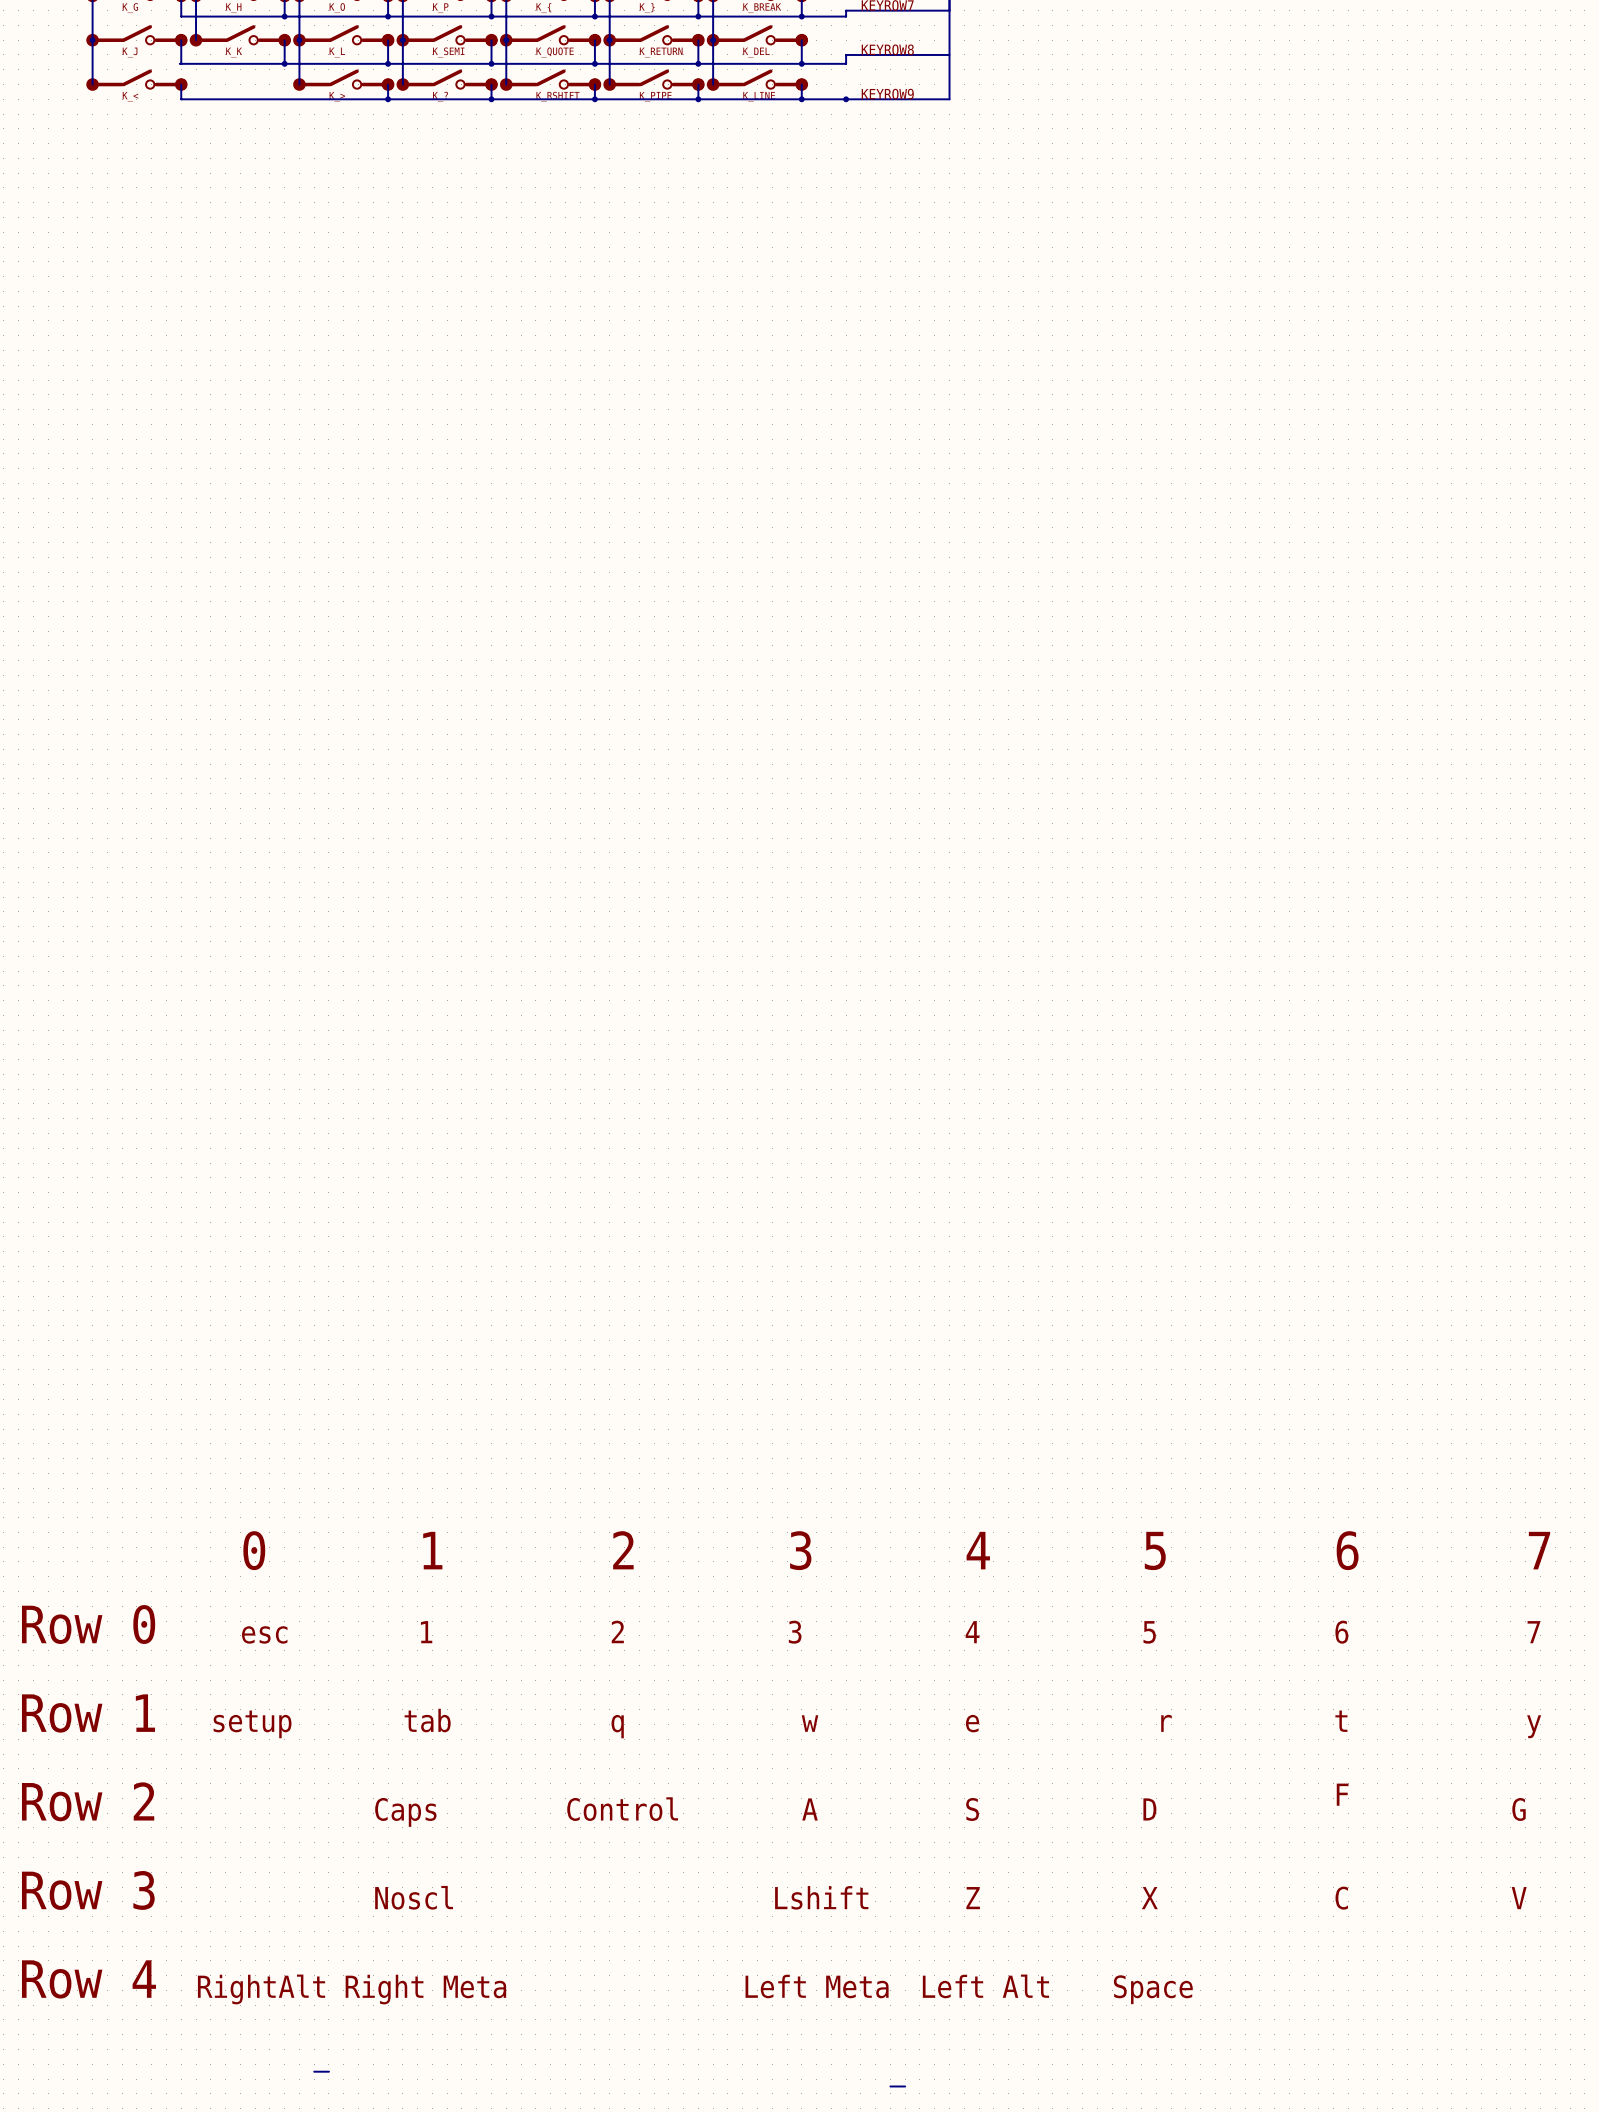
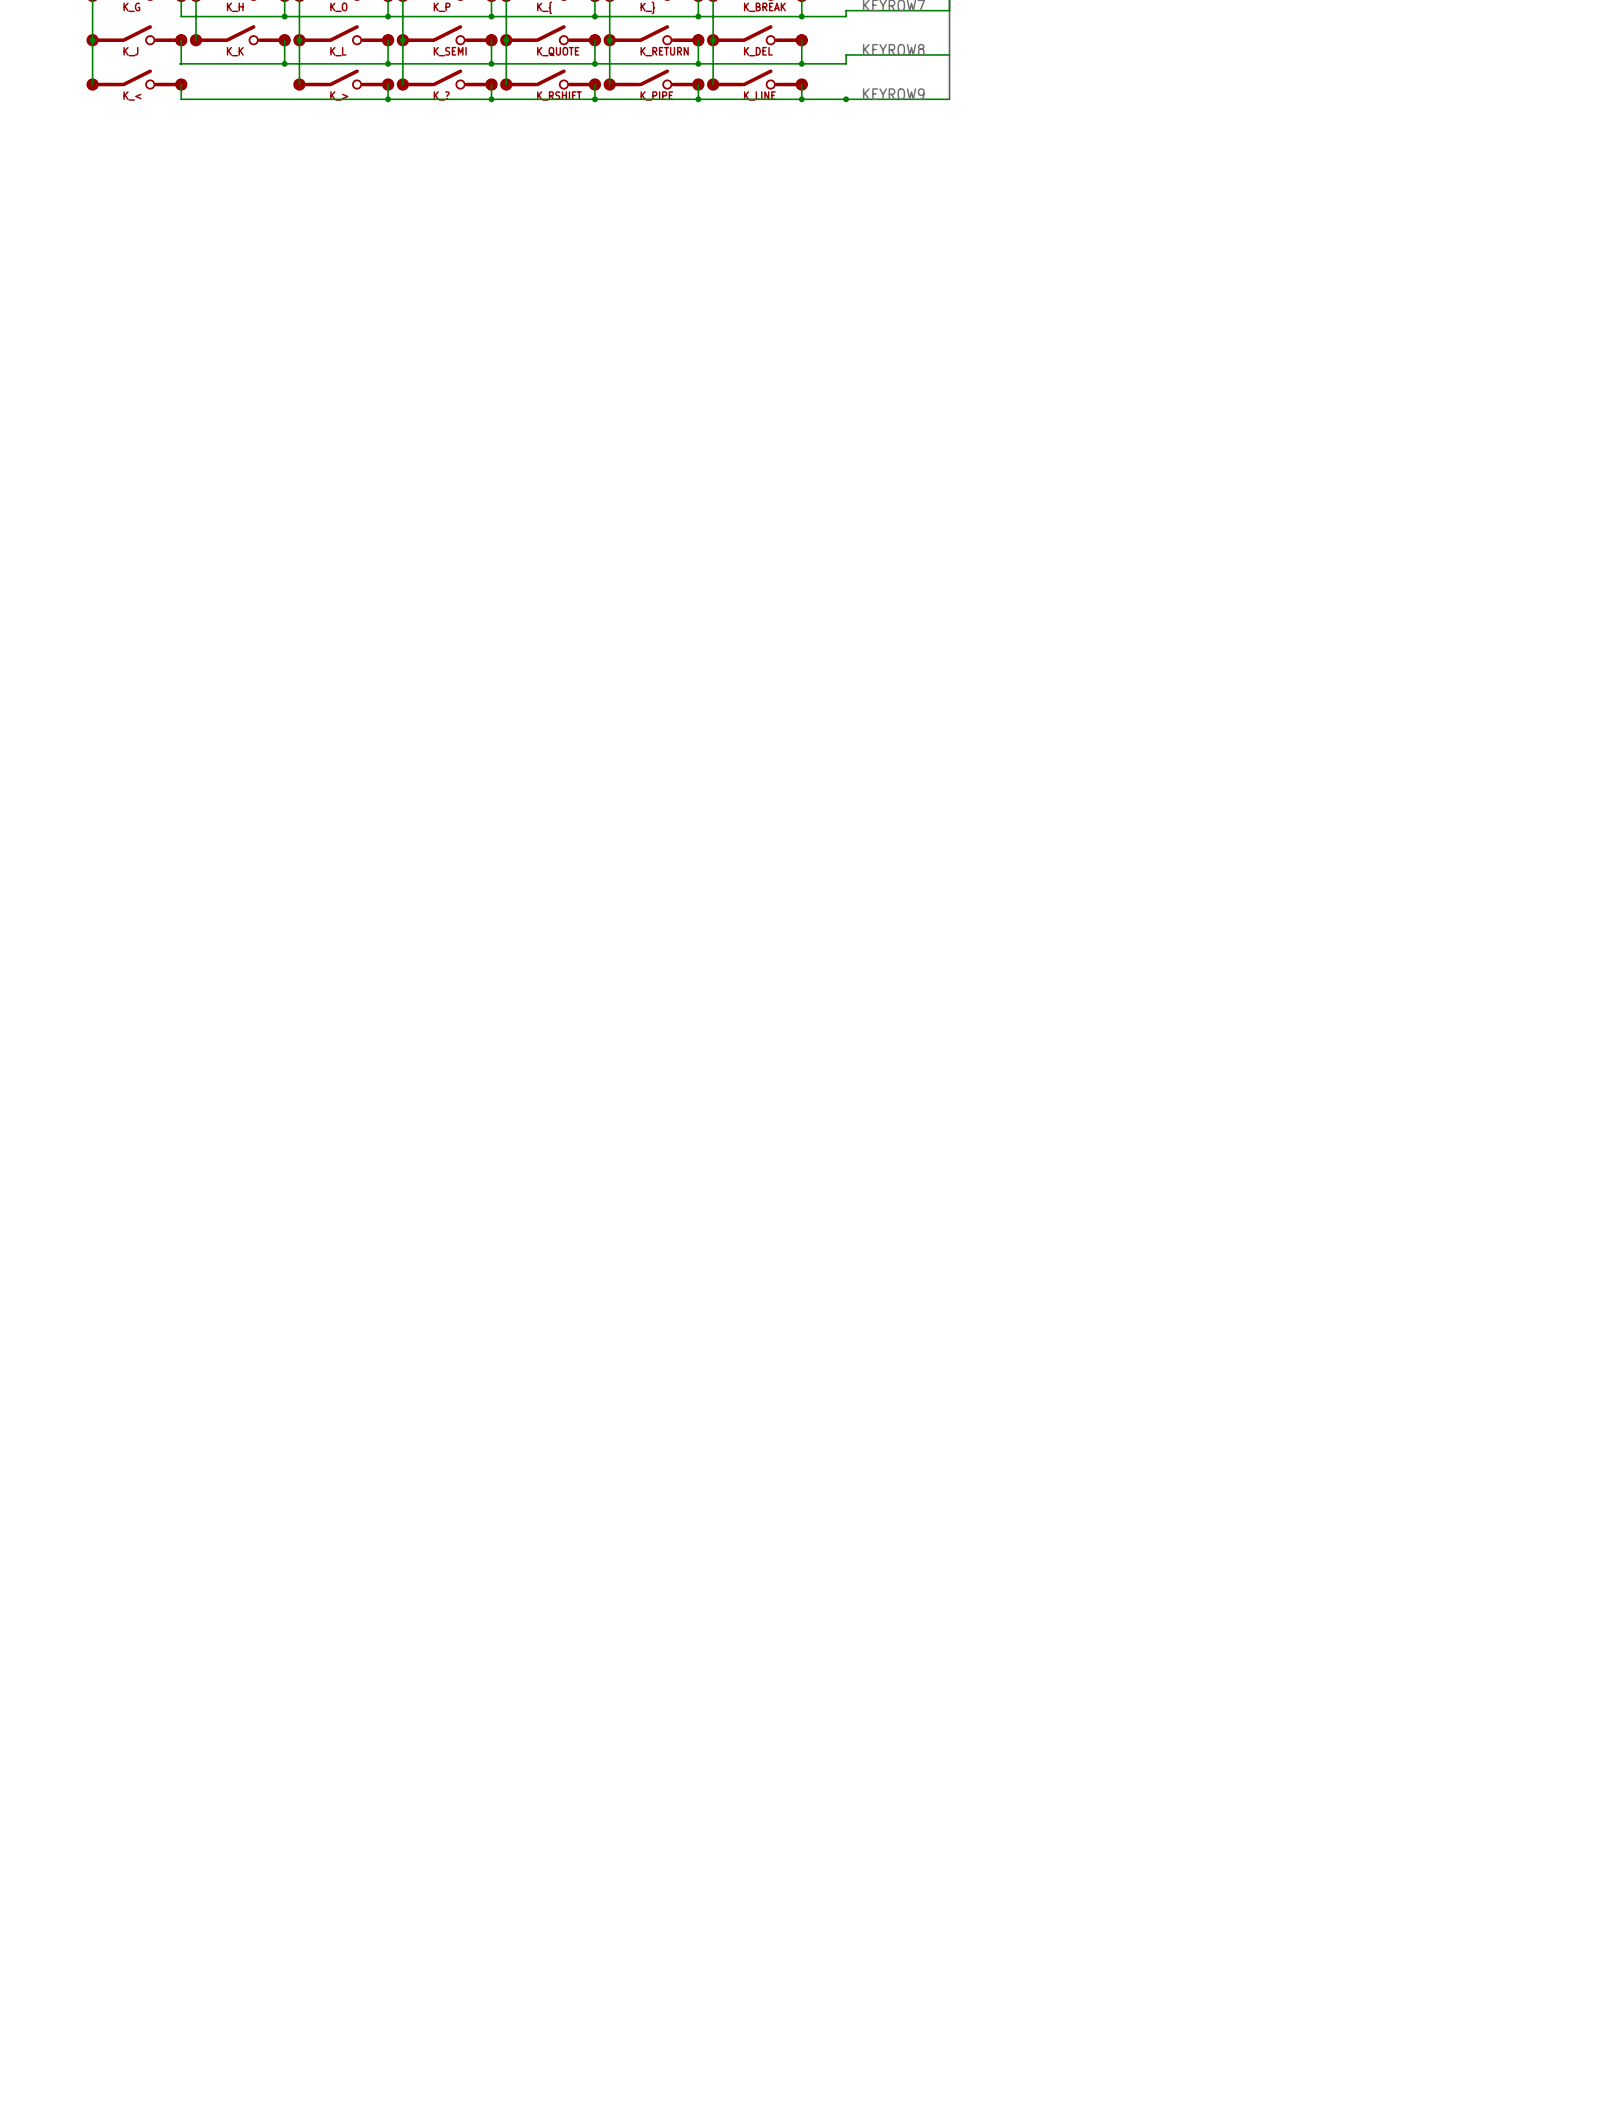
text: 0 (254, 1550) -> none
text: 1 (432, 1550) -> none
text: 2 (623, 1550) -> none
text: 3 (800, 1550) -> none
text: 4 (978, 1550) -> none
text: 5 (1155, 1550) -> none
text: 6 (1347, 1550) -> none
text: 7 (1539, 1550) -> none
text: Row 0 (88, 1624) -> none
text: 2 (617, 1631) -> none
text: 1 (426, 1632) -> none
text: 3 (795, 1632) -> none
text: 4 (972, 1632) -> none
text: 5 (1149, 1632) -> none
text: 6 (1341, 1632) -> none
text: 7 (1533, 1632) -> none
text: esc (264, 1634) -> none
text: Row 1 (88, 1713) -> none
text: tab (427, 1720) -> none
text: t (1341, 1721) -> none
text: w (810, 1723) -> none
text: e (972, 1723) -> none
text: r (1166, 1723) -> none
text: setup (252, 1724) -> none
text: q (617, 1726) -> none
text: y (1534, 1726) -> none
text: F (1342, 1794) -> none
text: Row 2 (88, 1801) -> none
text: Control (622, 1809) -> none
text: A (810, 1809) -> none
text: S (972, 1809) -> none
text: D (1149, 1809) -> none
text: G (1519, 1809) -> none
text: Caps (405, 1812) -> none
text: Row 3 (88, 1890) -> none
text: Noscl (414, 1897) -> none
text: Lshift (821, 1897) -> none
text: Z (973, 1898) -> none
text: X (1149, 1898) -> none
text: C (1341, 1898) -> none
text: V (1519, 1898) -> none
text: Row 4 (88, 1979) -> none
text: Left Meta (817, 1986) -> none
text: Left Alt (985, 1986) -> none
text: RightAlt (261, 1989) -> none
text: Right Meta (425, 1989) -> none
text: Space (1153, 1989) -> none
wire: (314, 2071) (328, 2071) -> none
wire: (890, 2086) (905, 2086) -> none

